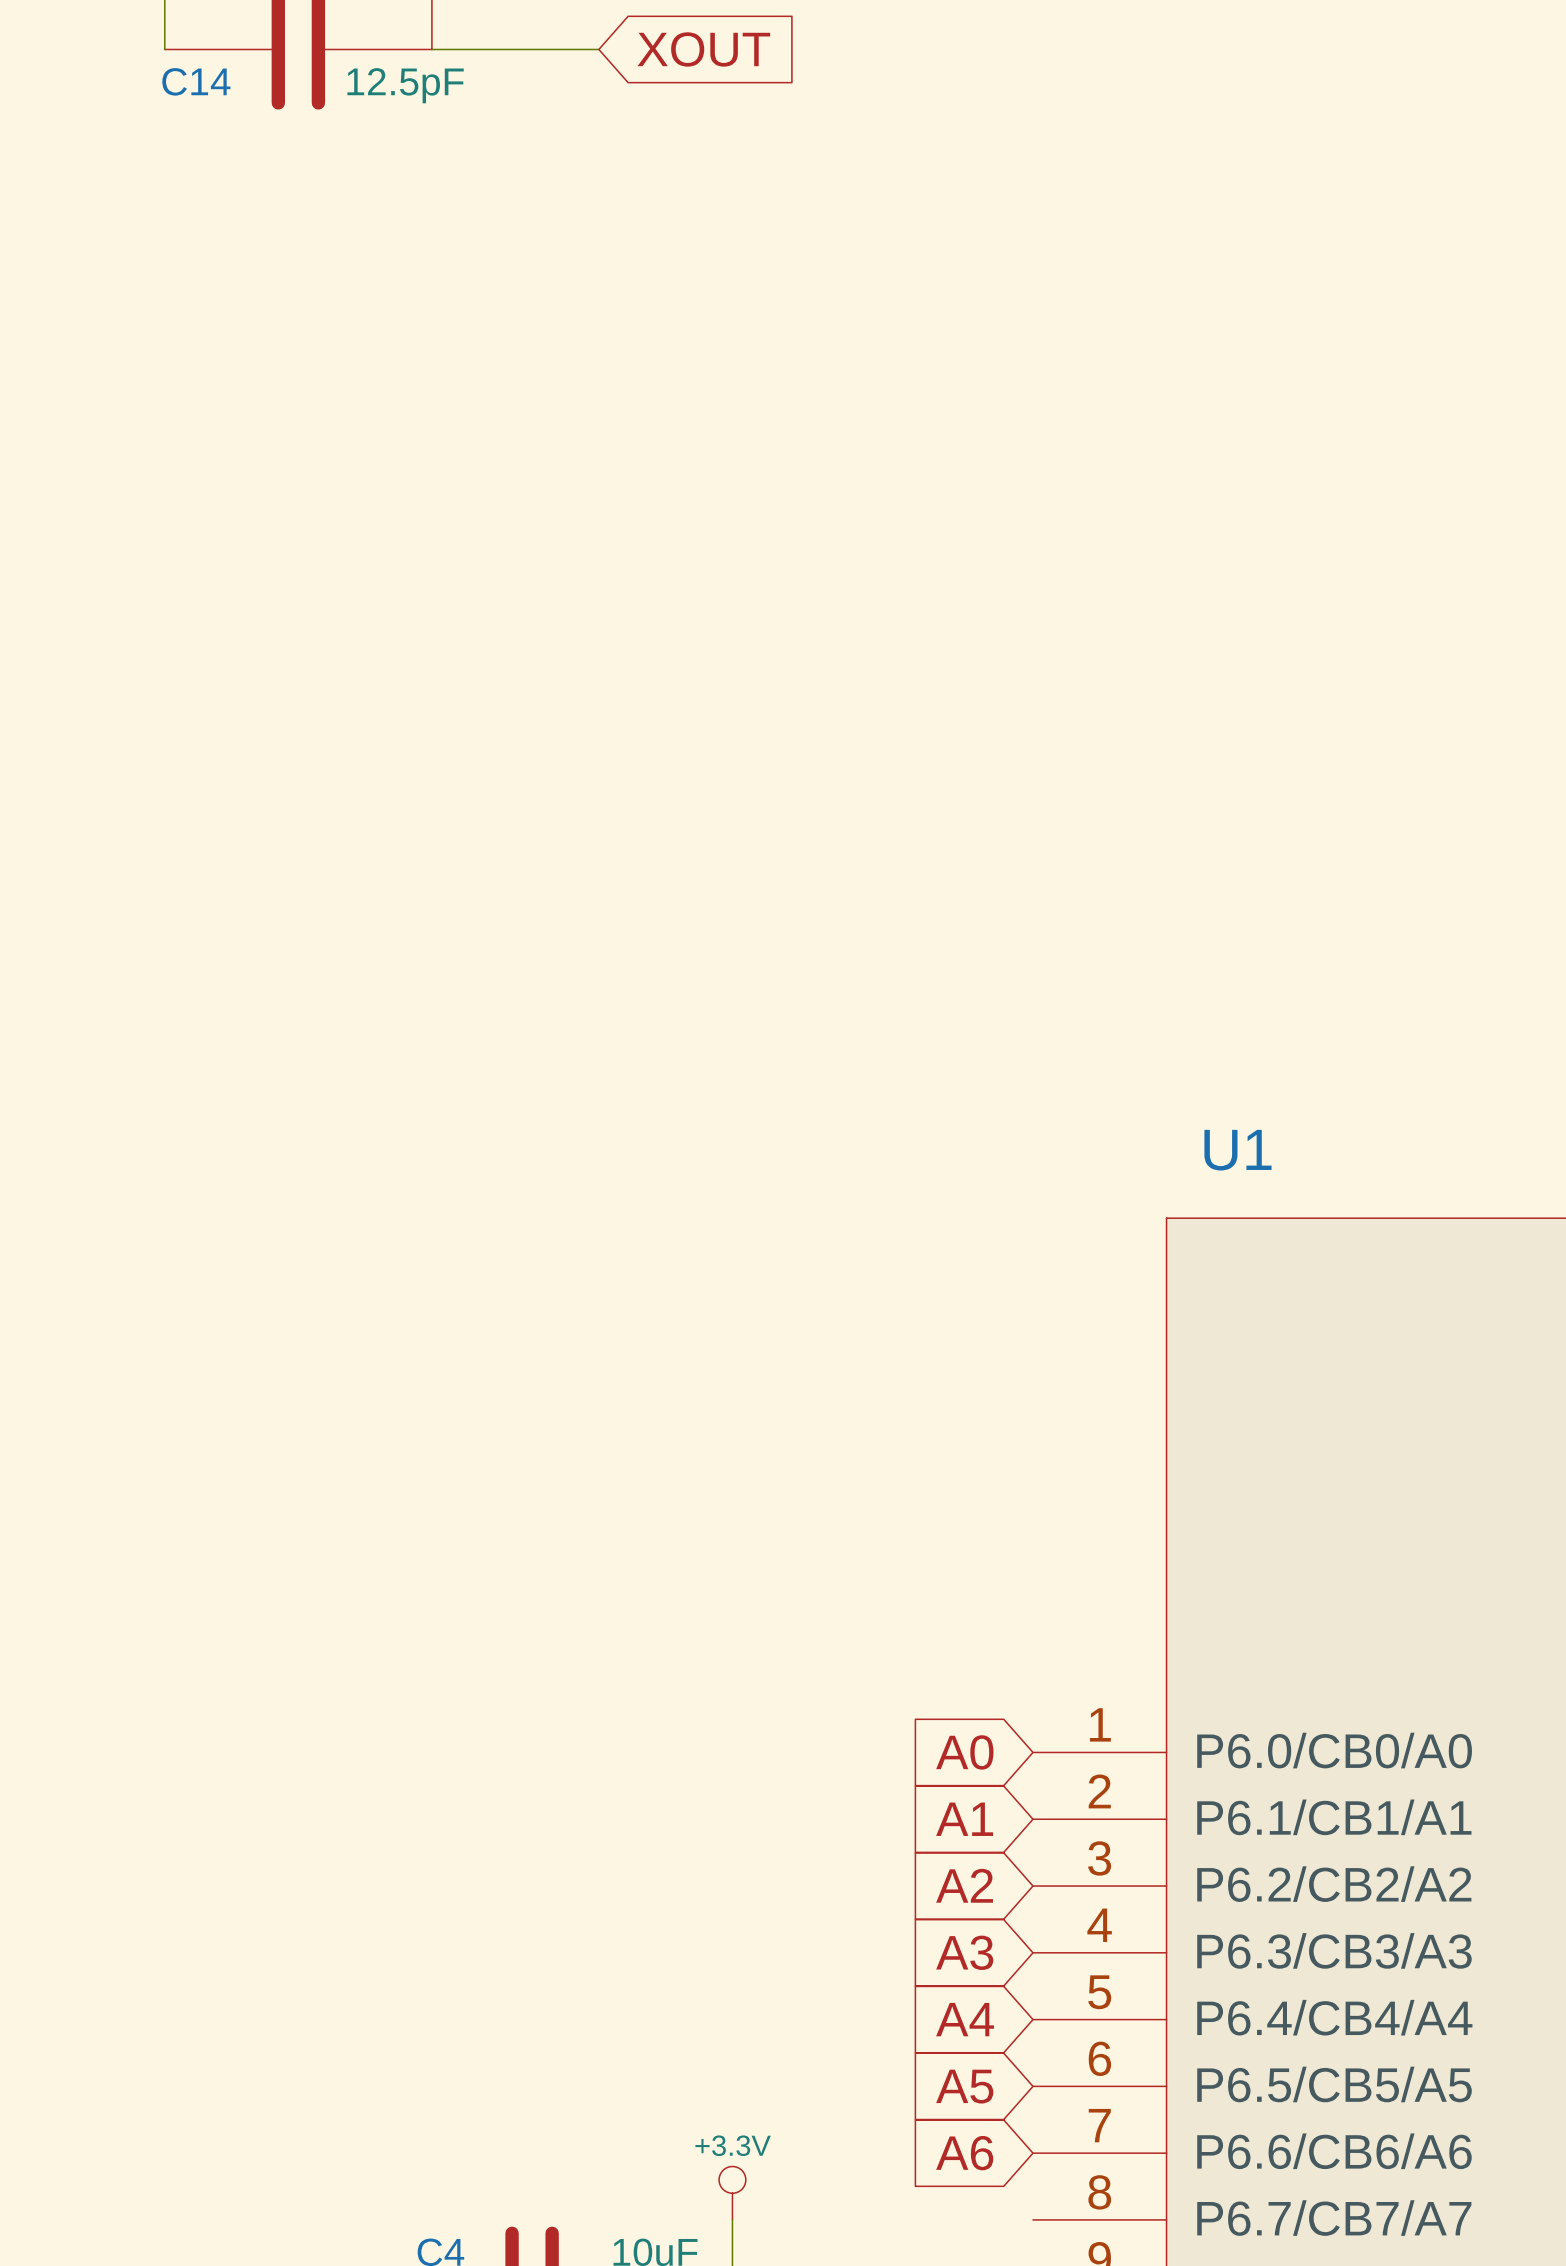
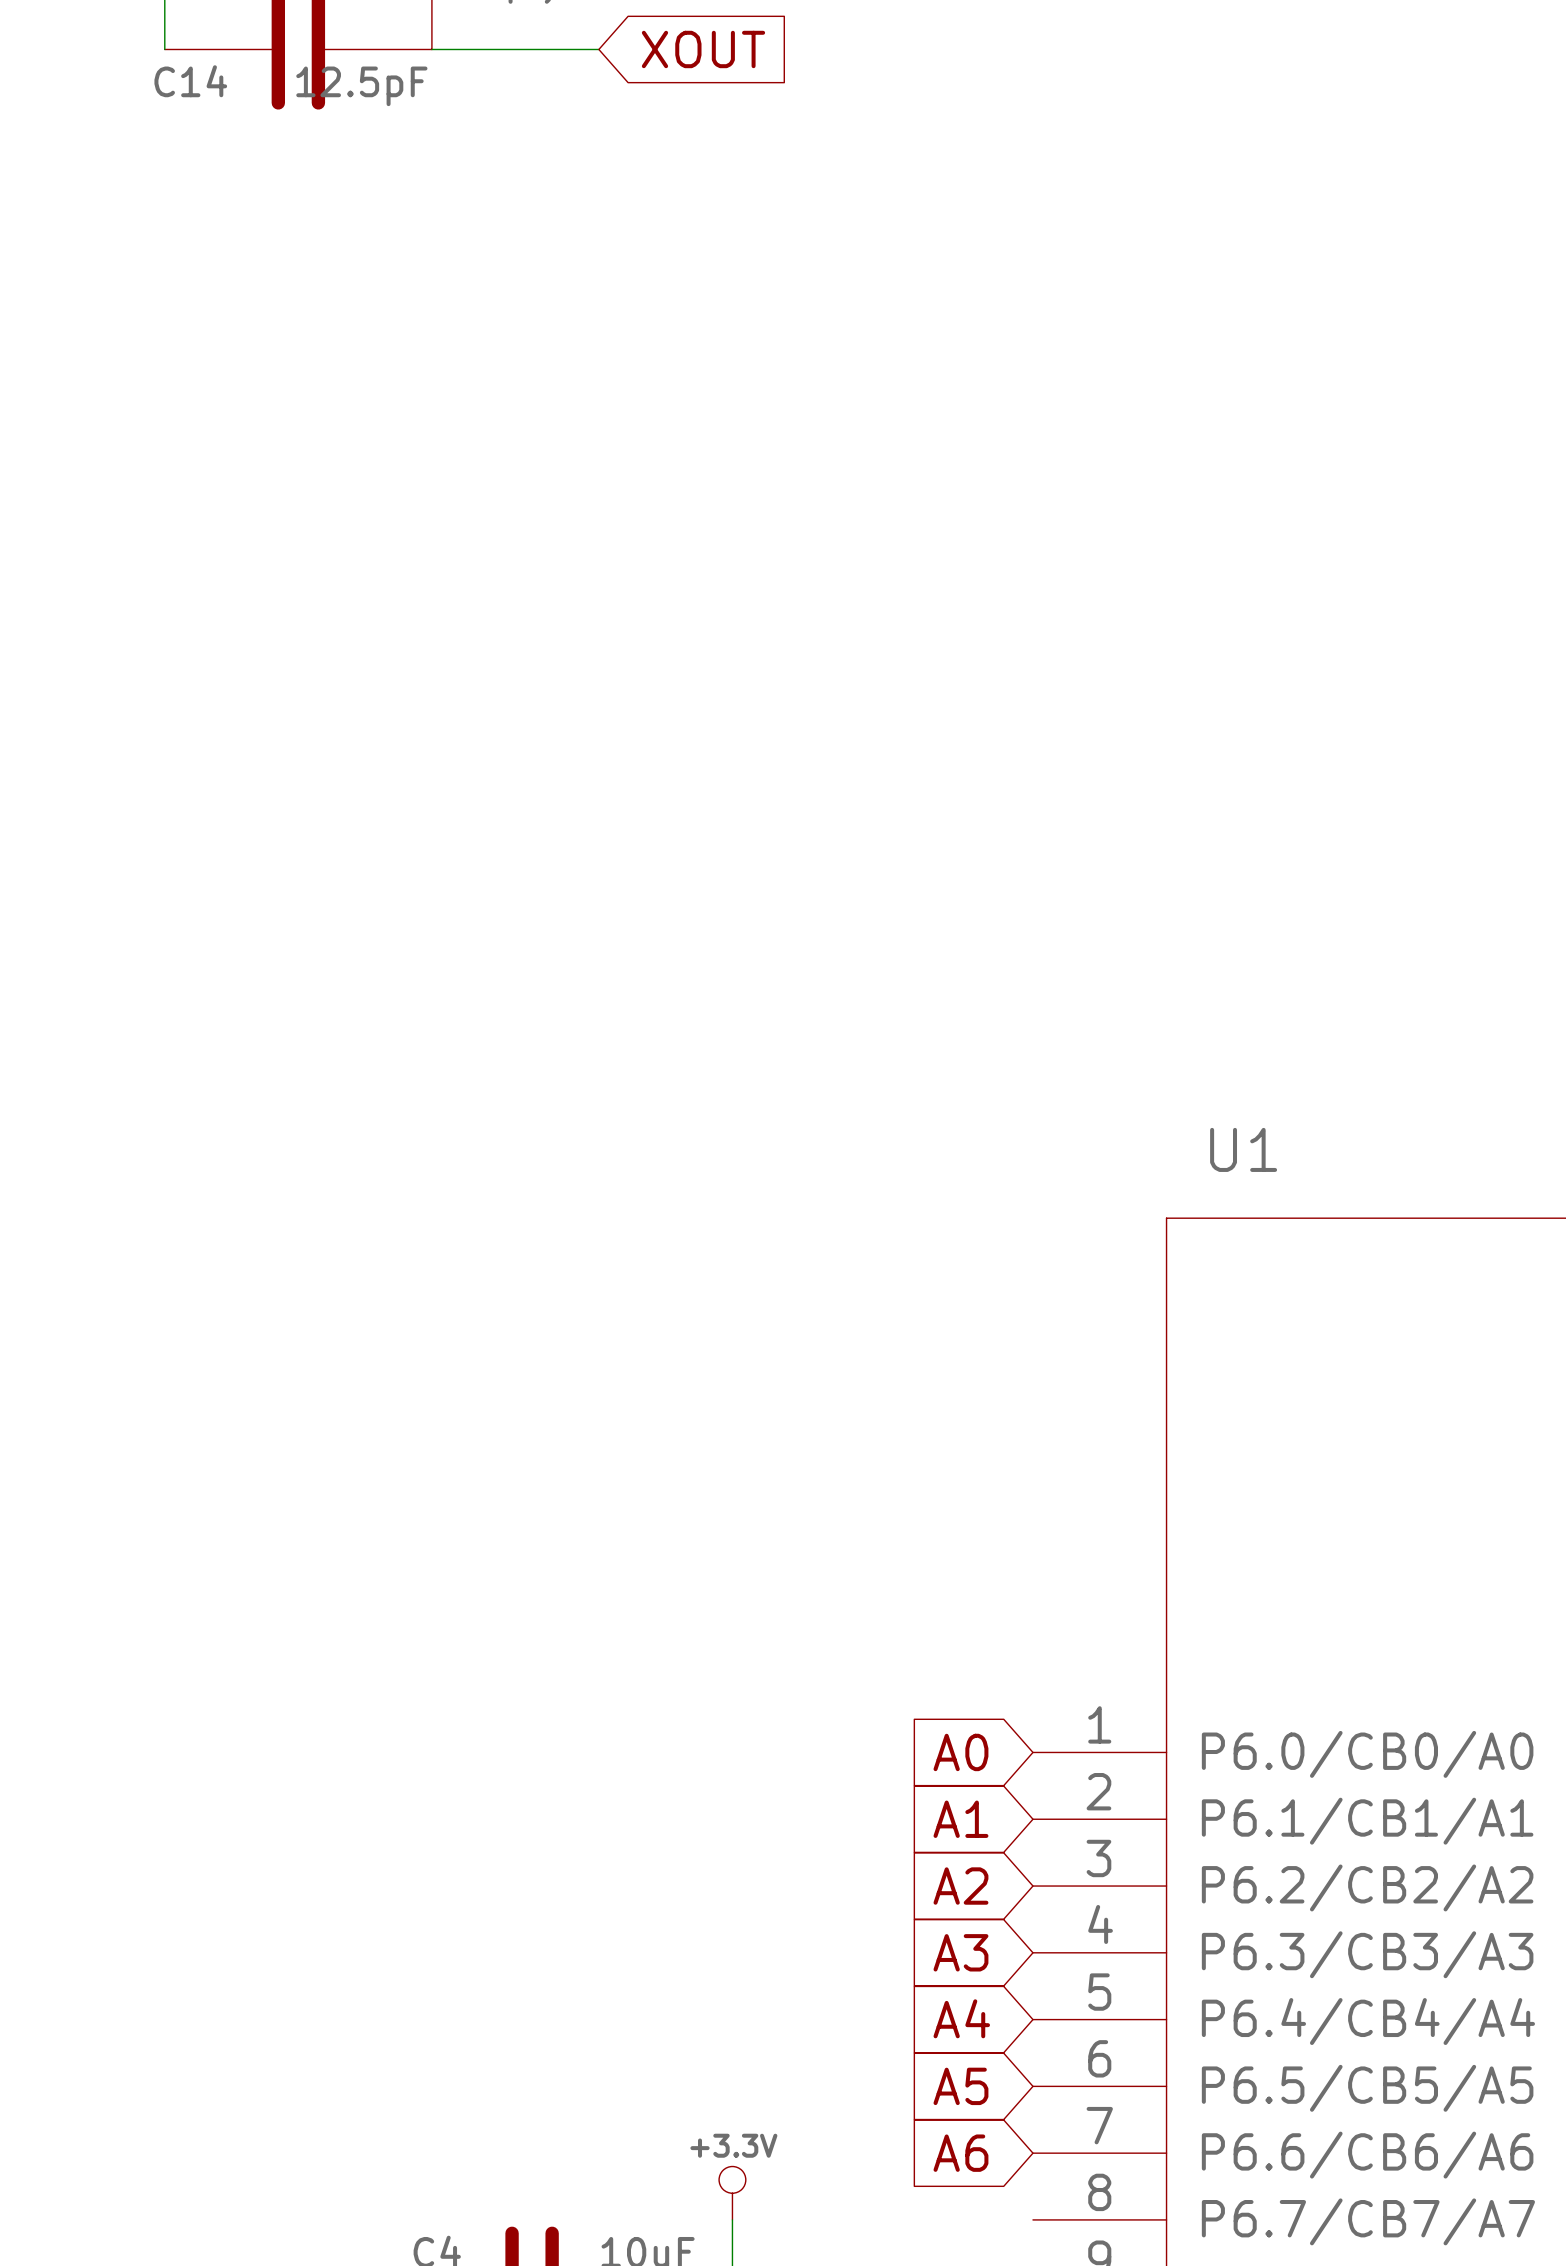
C14 value position: 12.5pF (405, 85) -> 12.5pF (361, 86)

